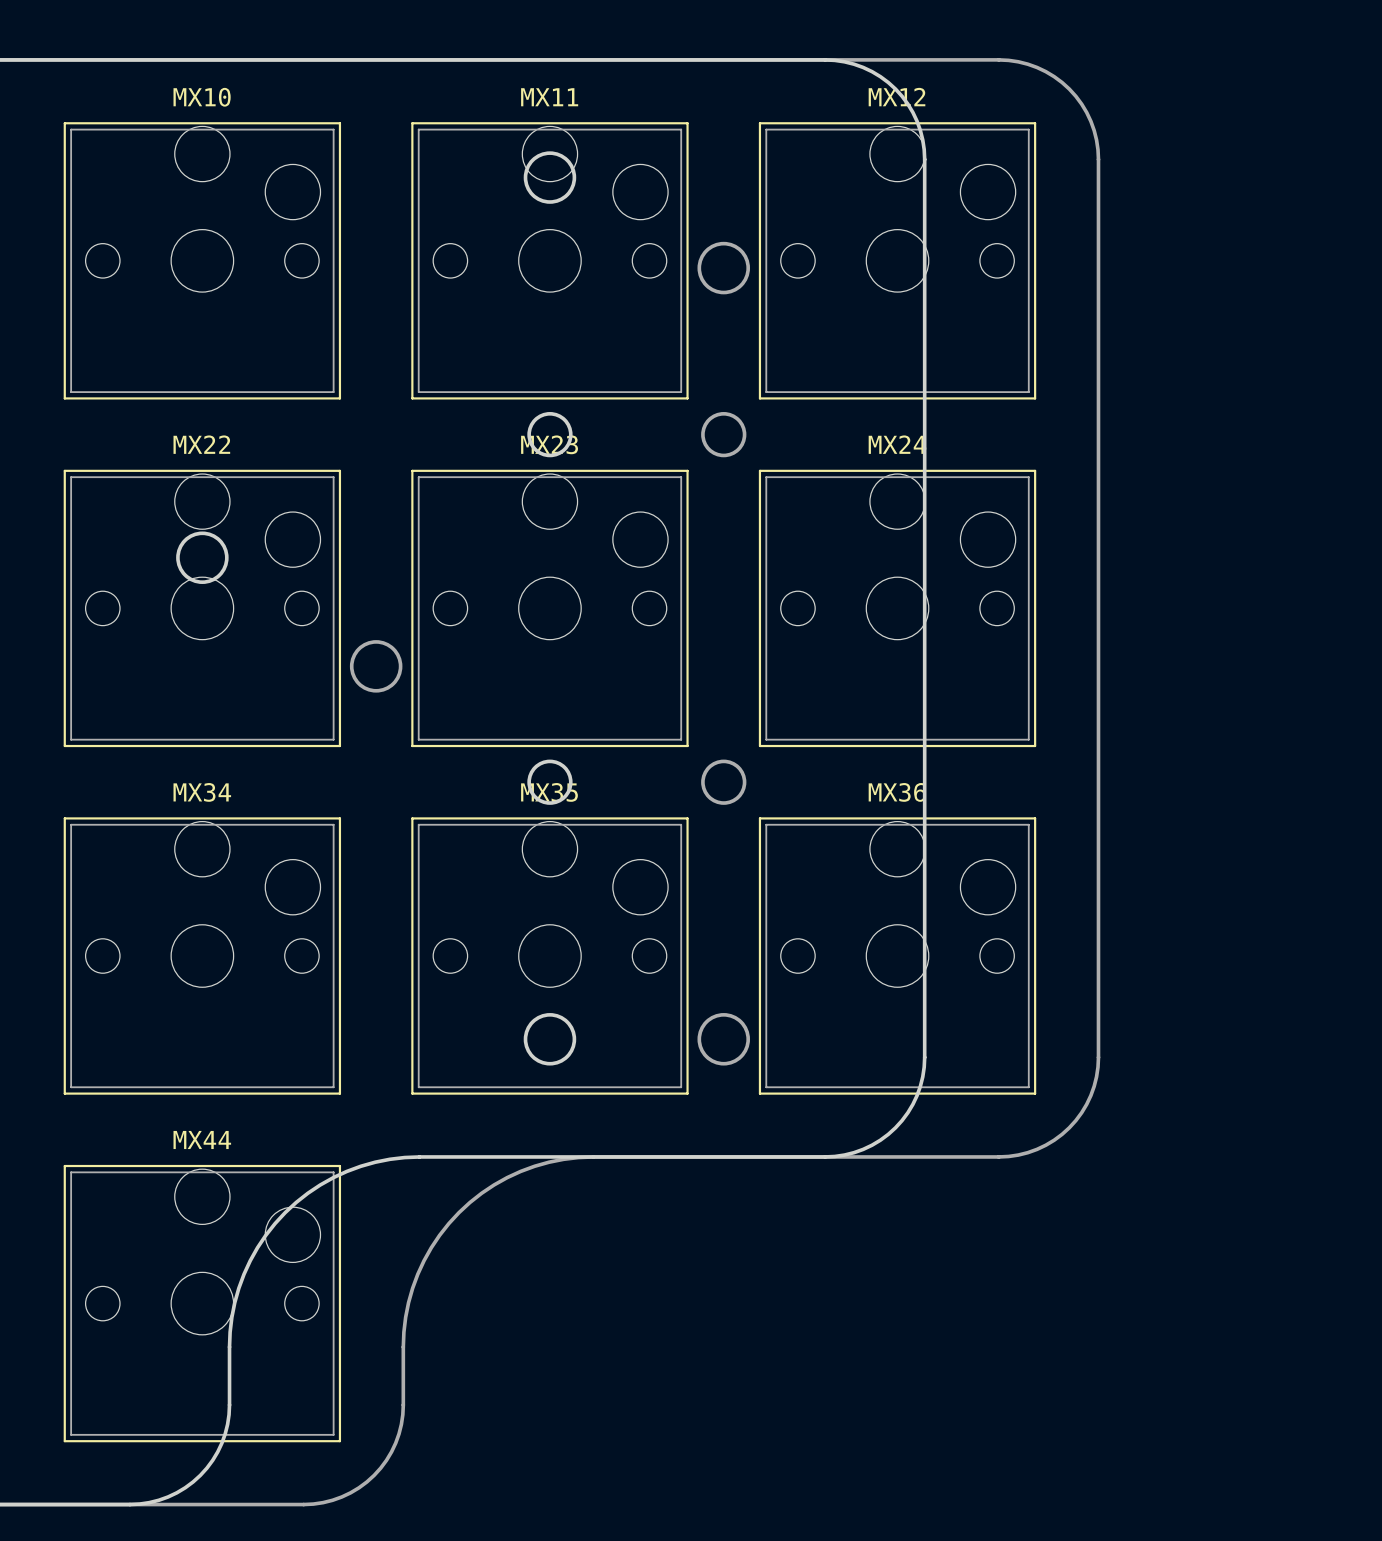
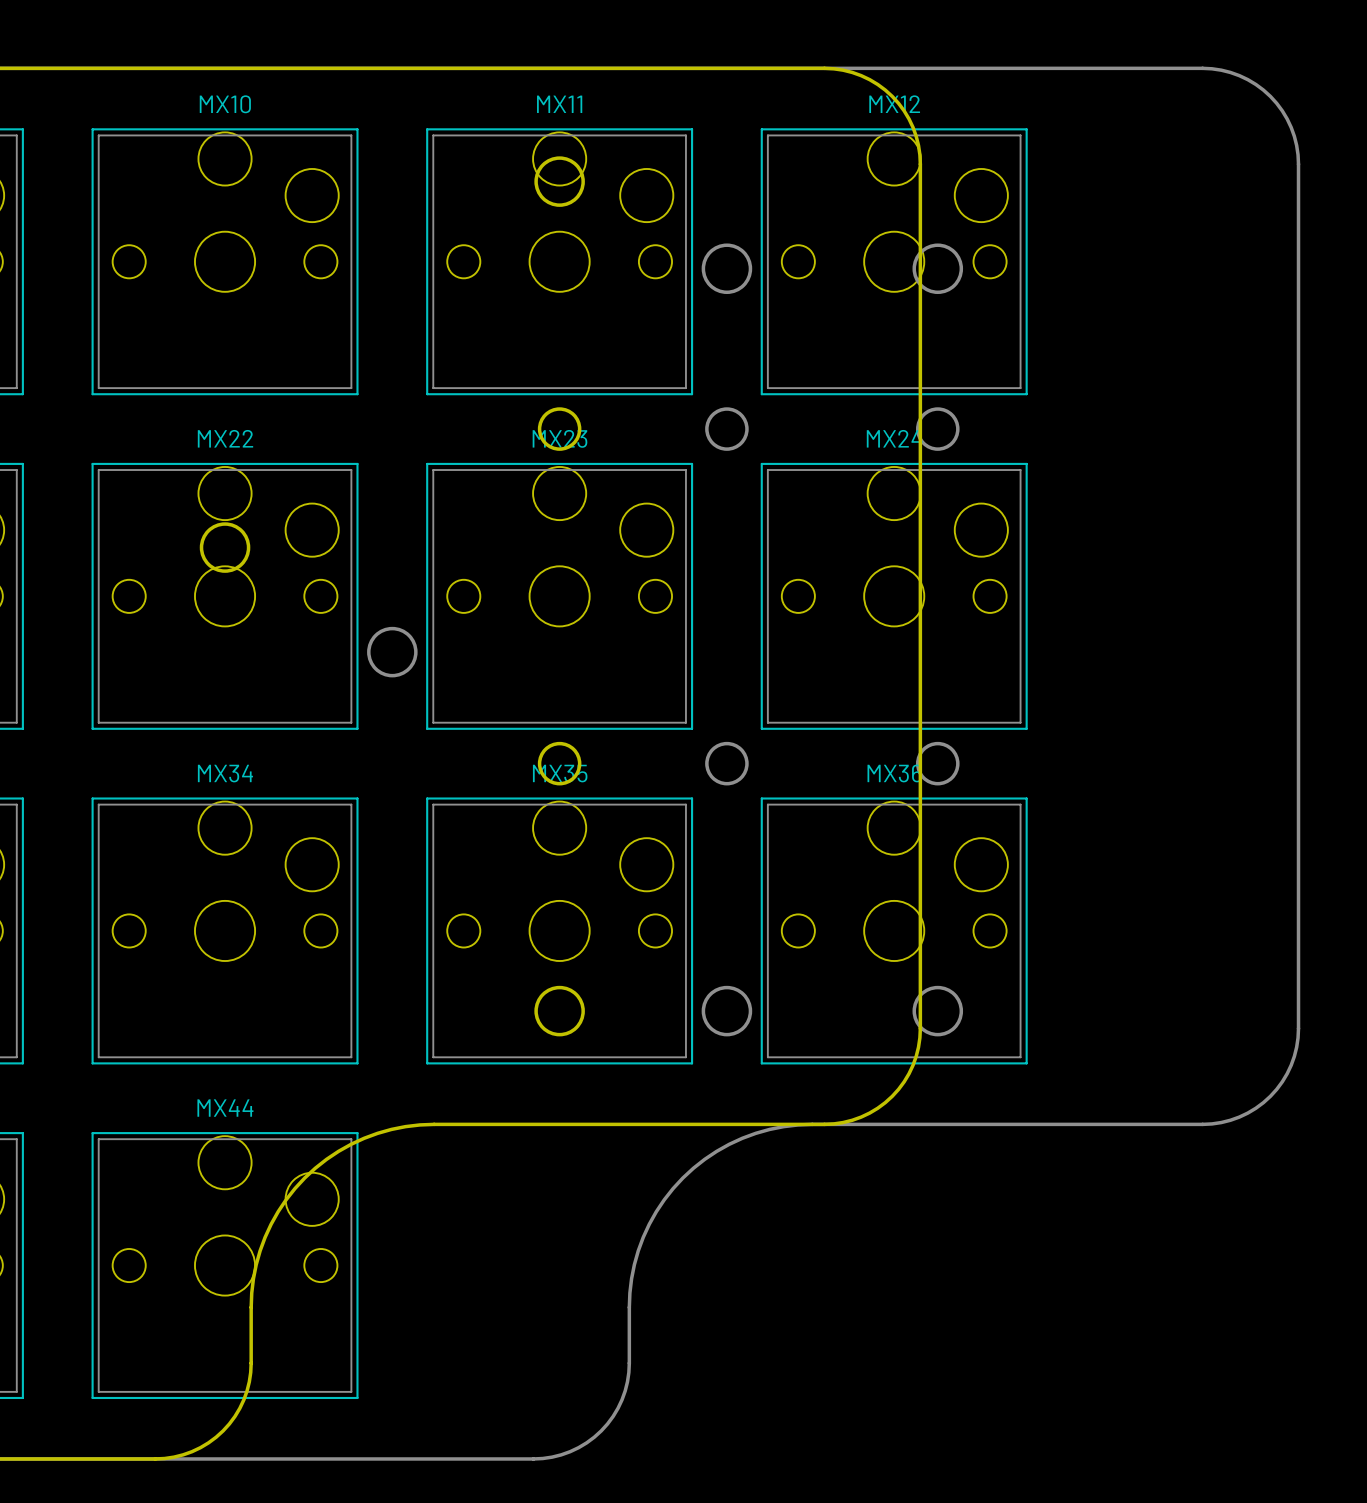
line: (998, 59) (1018, 61) (1037, 67) (1054, 76) (1069, 89) (1081, 104) (1090, 121) (1096, 140) (1098, 159) (1098, 1067) (1094, 1086) (1086, 1104) (1069, 1127) (1054, 1140) (1037, 1149) (1018, 1155) (998, 1156) -> (991, 68) (1202, 68) (1230, 72) (1255, 84) (1276, 103) (1291, 127) (1296, 145) (1298, 164) (1298, 1028) (1294, 1056) (1287, 1073) (1270, 1096) (1247, 1113) (1221, 1122) (1202, 1124) (991, 1124)
drawing: none -> [912, 243, 964, 295]
drawing: none -> [916, 407, 960, 451]
drawing: none -> [916, 741, 960, 786]
drawing: none -> [912, 985, 964, 1037]
line: (812, 1156) (578, 1157) (534, 1166) (507, 1177) (481, 1193) (458, 1212) (439, 1235) (424, 1260) (412, 1288) (403, 1332) (402, 1414) (399, 1433) (391, 1451) (380, 1468) (359, 1487) (332, 1500) (303, 1504) -> (812, 1124) (769, 1129) (729, 1144) (693, 1168) (664, 1199) (643, 1237) (634, 1264) (629, 1293) (629, 1363) (625, 1390) (613, 1416) (601, 1430) (586, 1442) (570, 1451) (542, 1458) (322, 1458)

